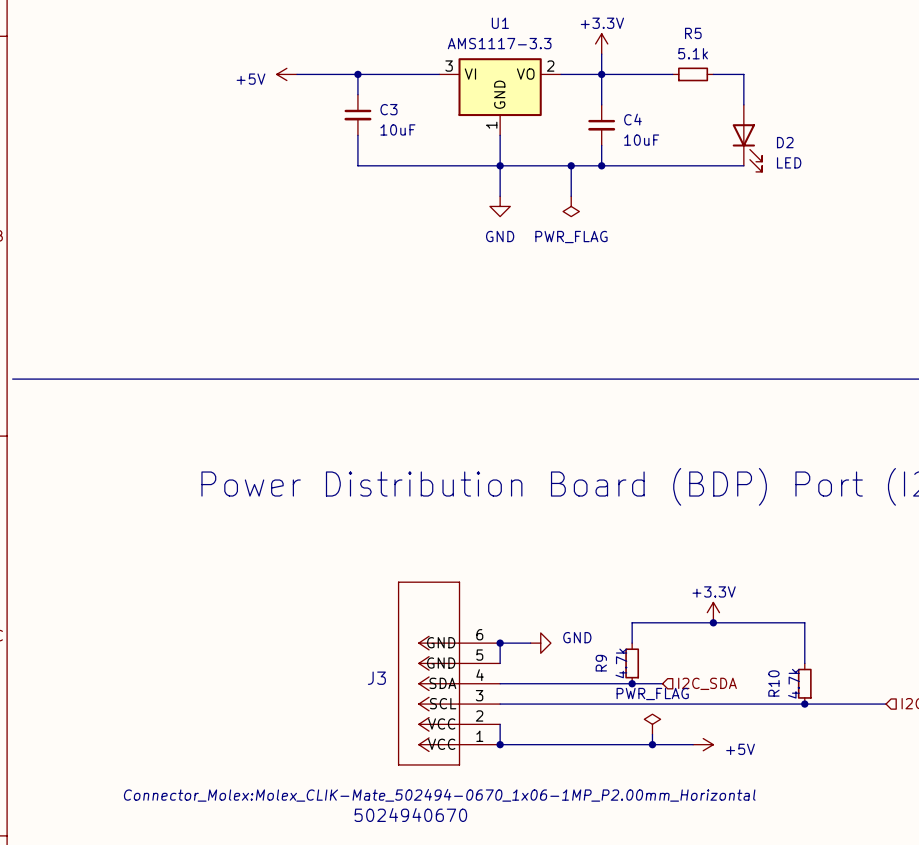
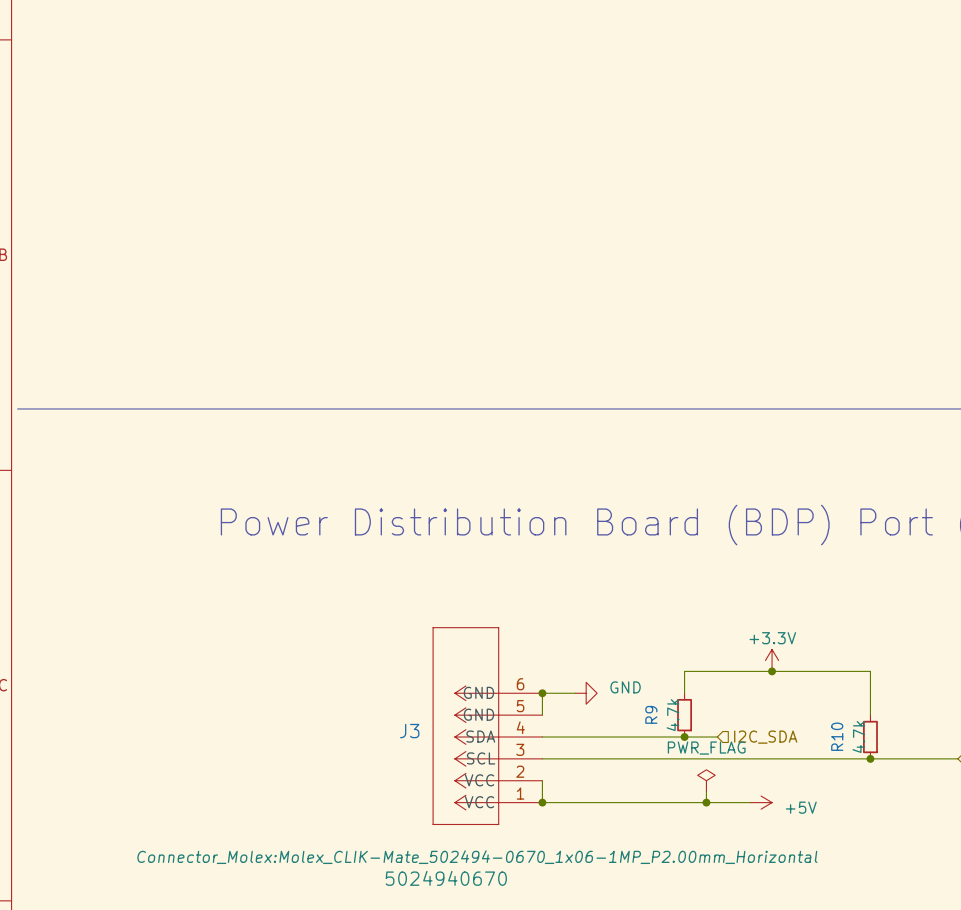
power symbol: +3.3V (601, 43) -> none
wire: (601, 54) (601, 104) -> none
power symbol: +5V (286, 74) -> none
wire: (297, 74) (439, 74) -> none
wire: (357, 74) (357, 94) -> none
junction: (357, 74) -> none
wire: (561, 74) (672, 74) -> none
junction: (601, 74) -> none
R5: 5.1k (693, 74) -> none
wire: (713, 74) (743, 74) (743, 104) -> none
U1: AMS1117-3.3 (500, 96) -> none
C3: 10uF (357, 115) -> none
C4: 10uF (601, 125) -> none
wire: (357, 135) (357, 165) (743, 165) -> none
wire: (500, 135) (500, 196) -> none
D2: LED (747, 138) -> none
wire: (601, 145) (601, 165) -> none
junction: (500, 165) -> none
wire: (571, 165) (571, 196) -> none
junction: (571, 165) -> none
junction: (601, 165) -> none
power symbol: GND (500, 206) -> none
power symbol: PWR_FLAG (571, 206) -> none

